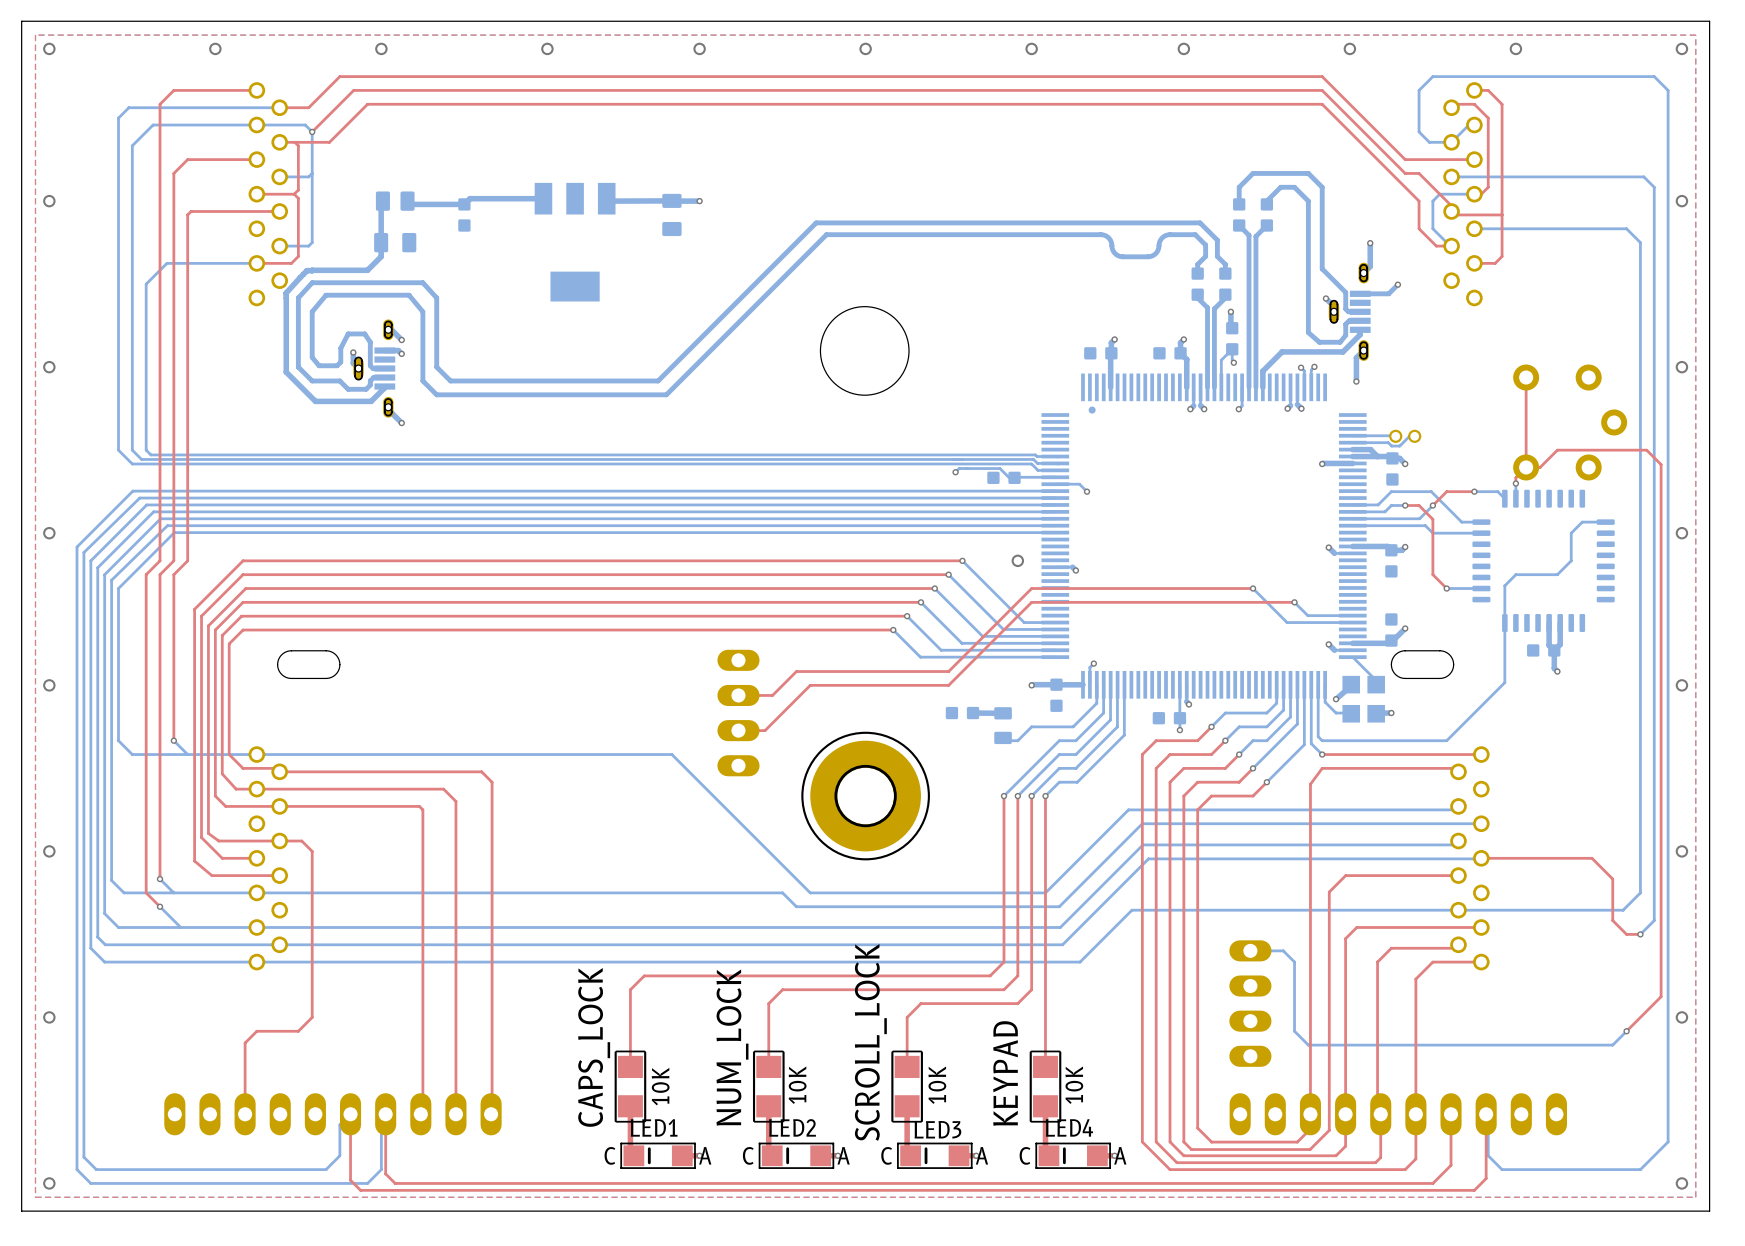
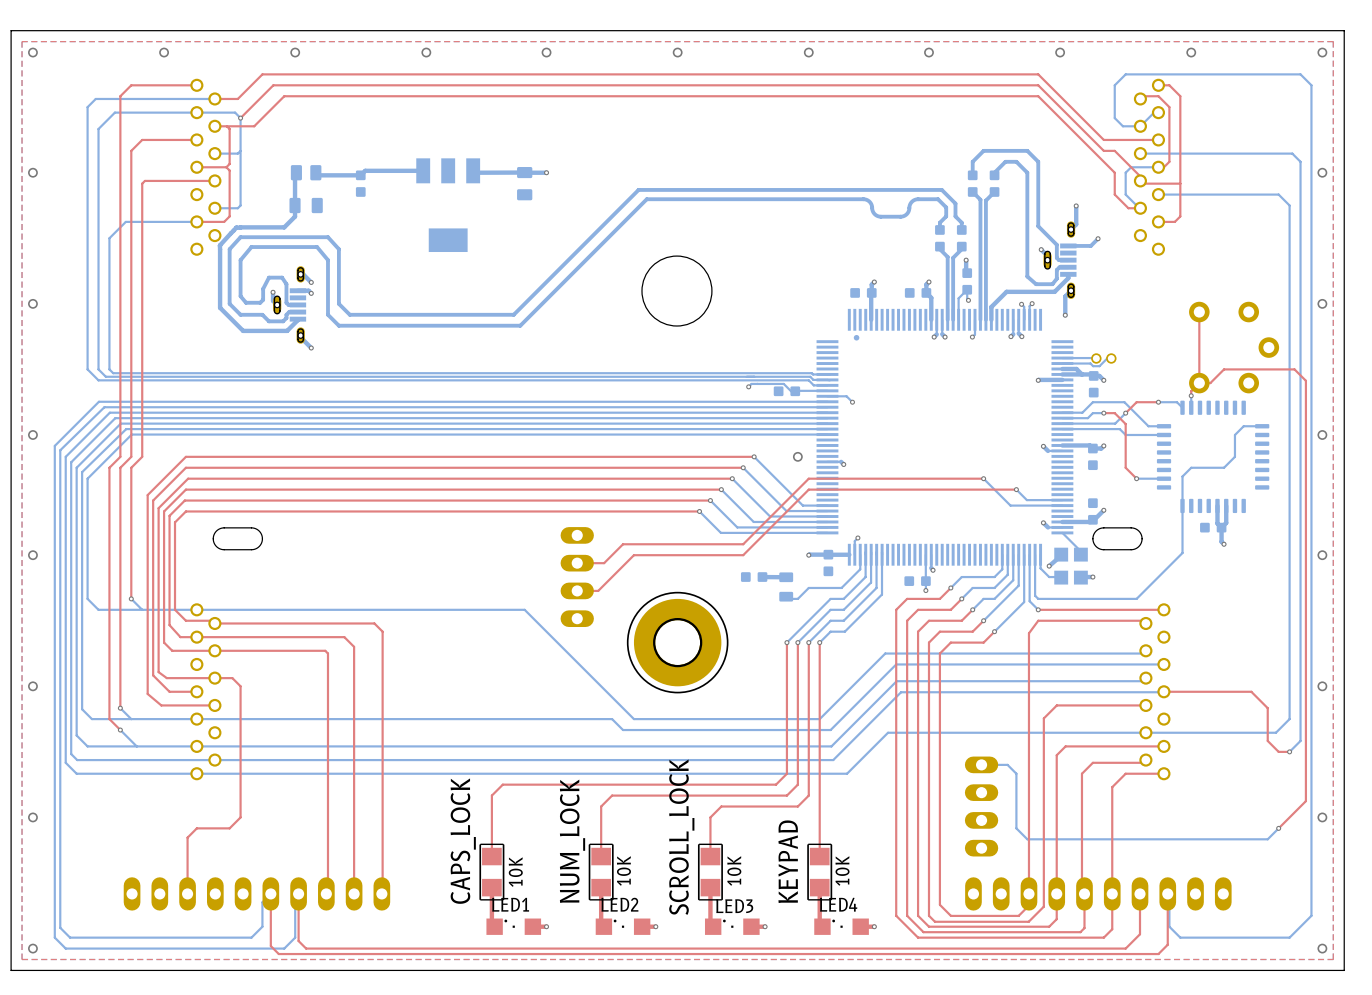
LED1 footprint: [620, 1142, 696, 1169] -> [486, 918, 542, 935]
LED2 footprint: [758, 1142, 835, 1169] -> [595, 918, 651, 935]
LED3 footprint: [897, 1142, 973, 1169] -> [704, 918, 760, 935]
LED4 footprint: [1035, 1142, 1111, 1169] -> [814, 918, 869, 935]

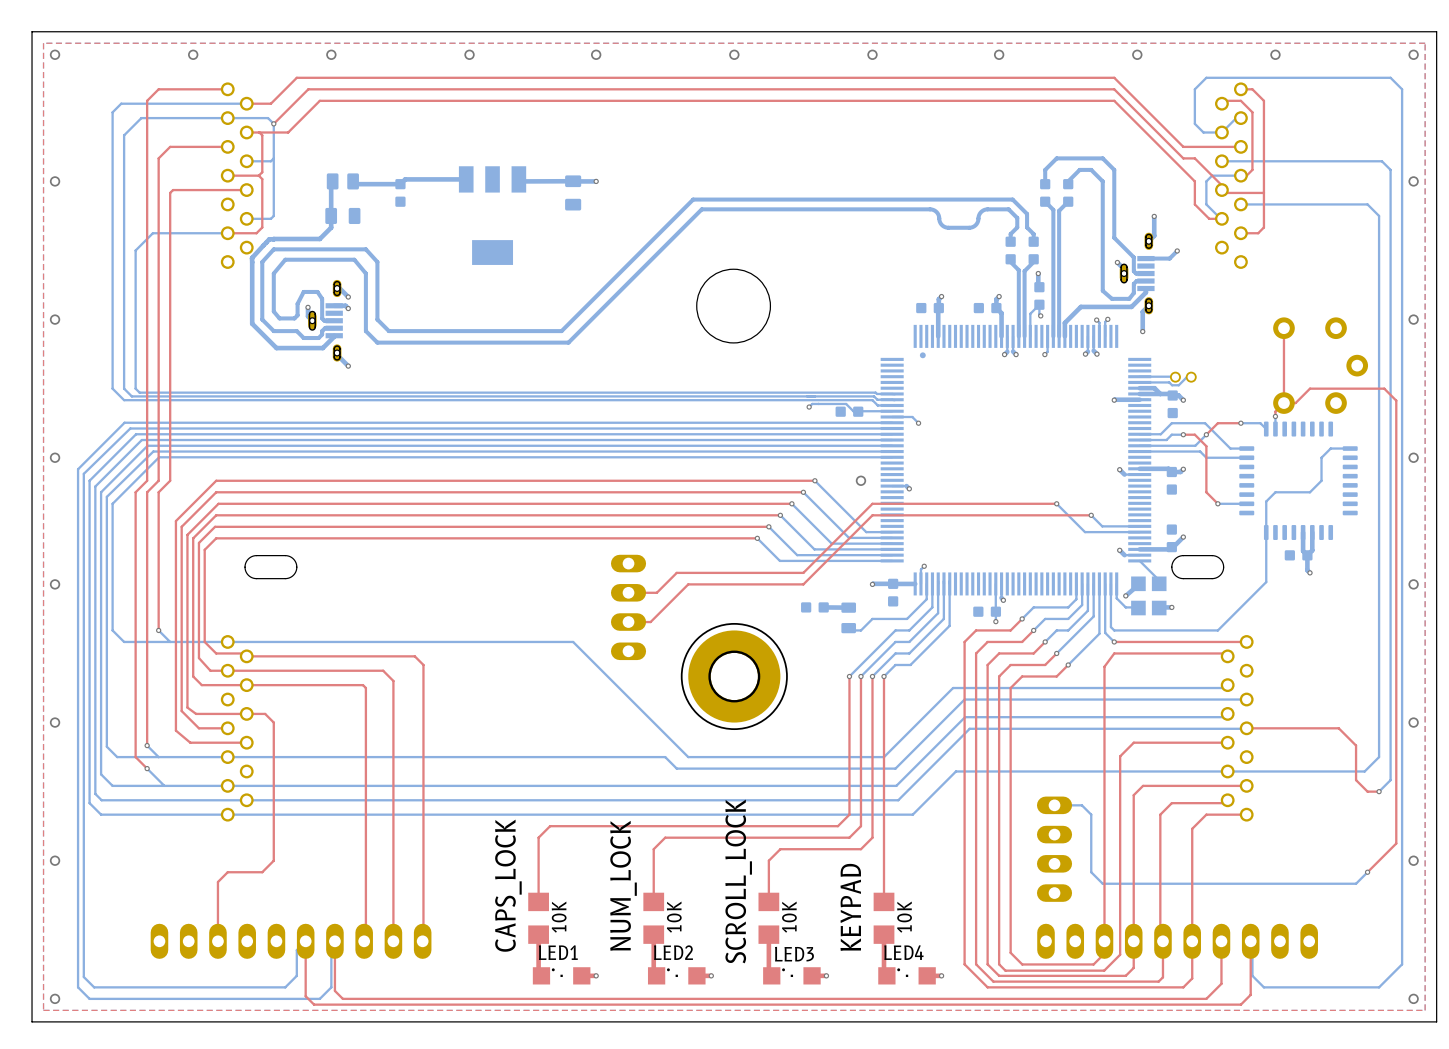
part footprint: [479, 843, 505, 901] -> [528, 892, 549, 944]
part footprint: [588, 843, 614, 901] -> [643, 892, 665, 944]
part footprint: [697, 843, 723, 901] -> [758, 892, 780, 944]
part footprint: [807, 843, 833, 901] -> [873, 892, 895, 944]

